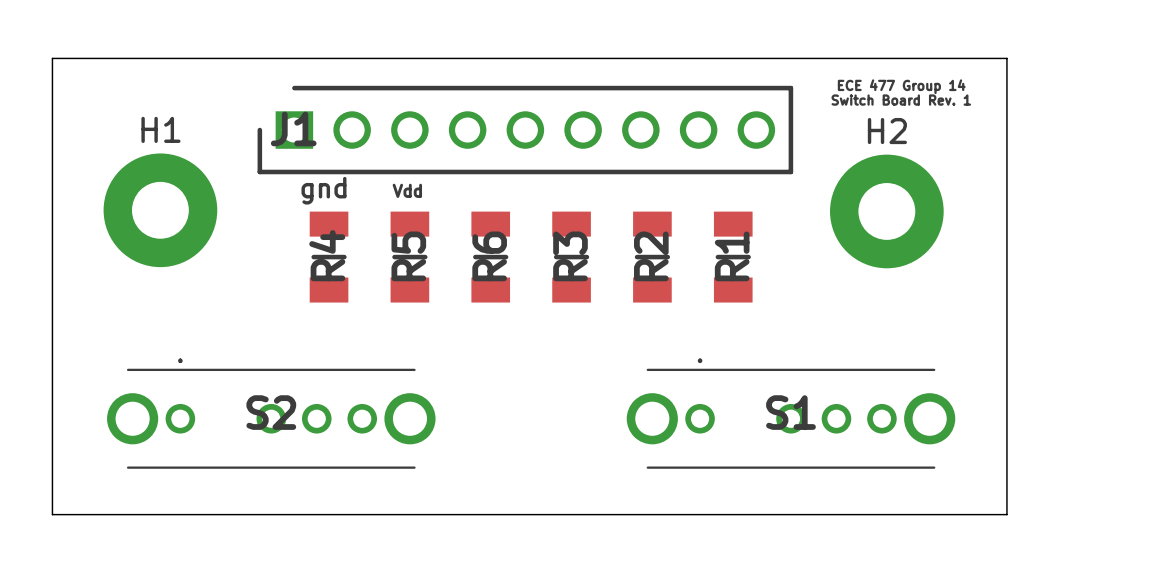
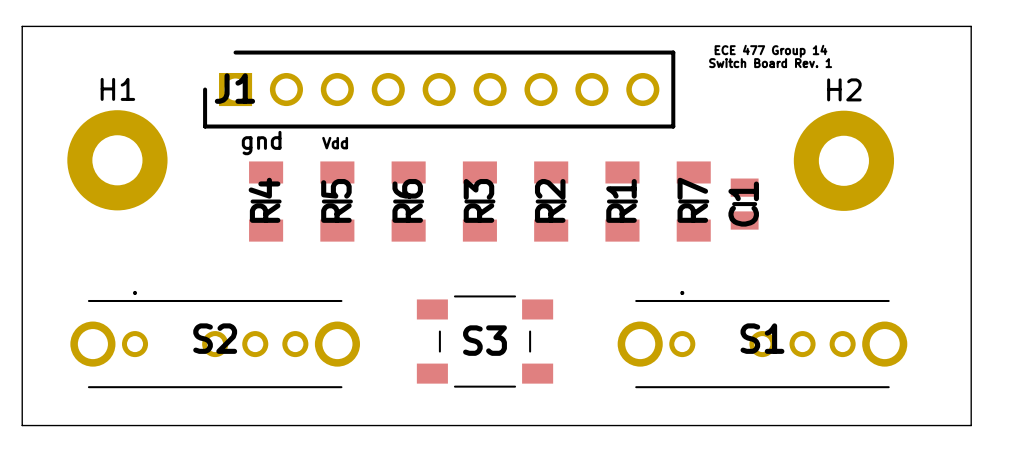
board edge: (1006, 58) (1006, 514) (52, 514) (52, 511) -> (863, 26) (971, 26) (971, 425) (22, 425)
H2 position: (886, 211) -> (843, 160)
R7: none -> (693, 201)
C1: none -> (744, 204)
S1 position: (791, 413) -> (762, 339)
S3: none -> (485, 341)

